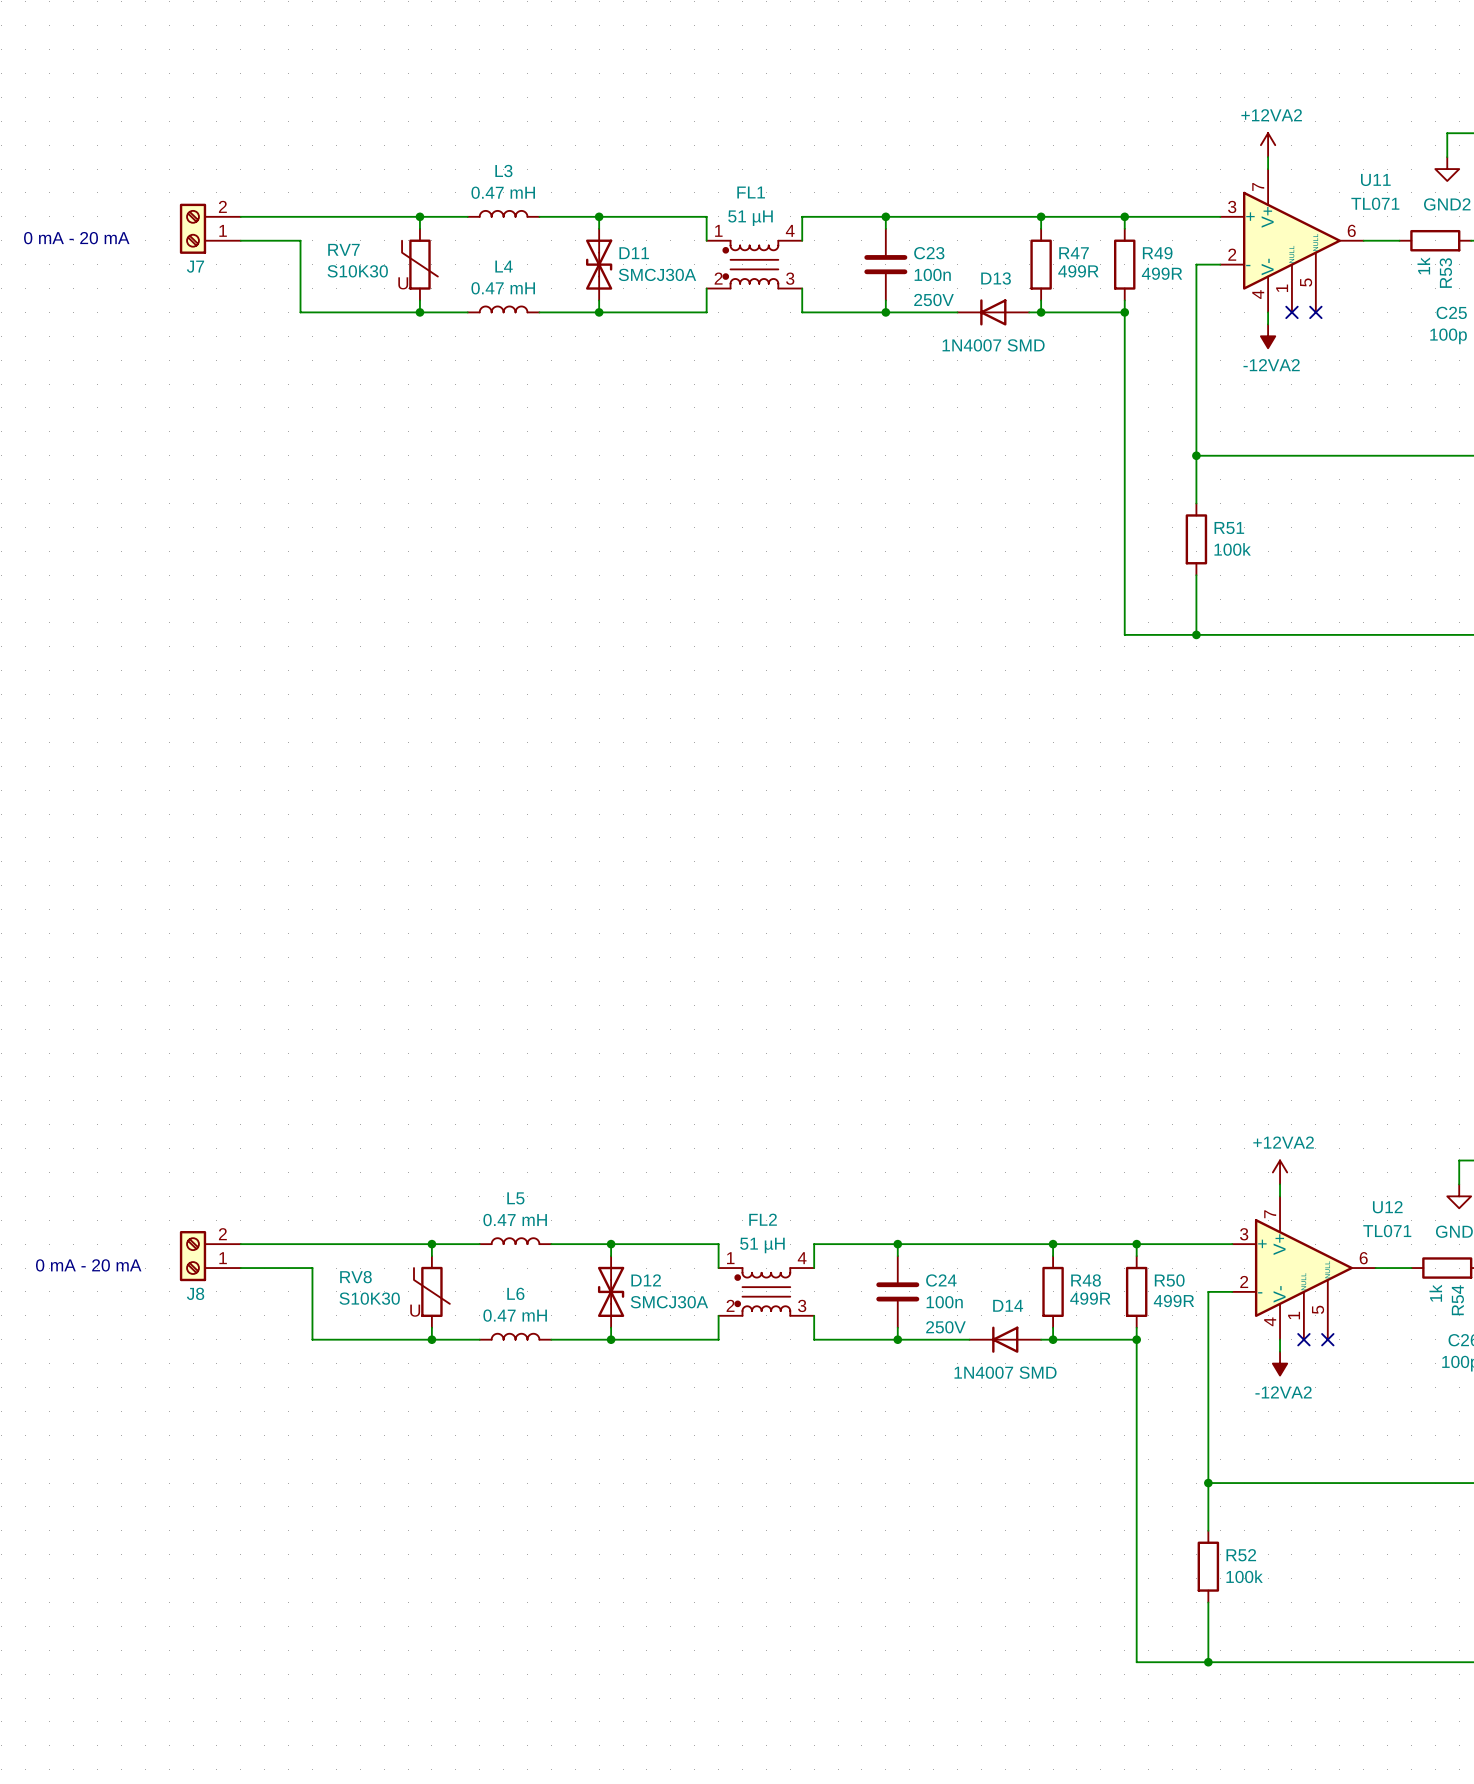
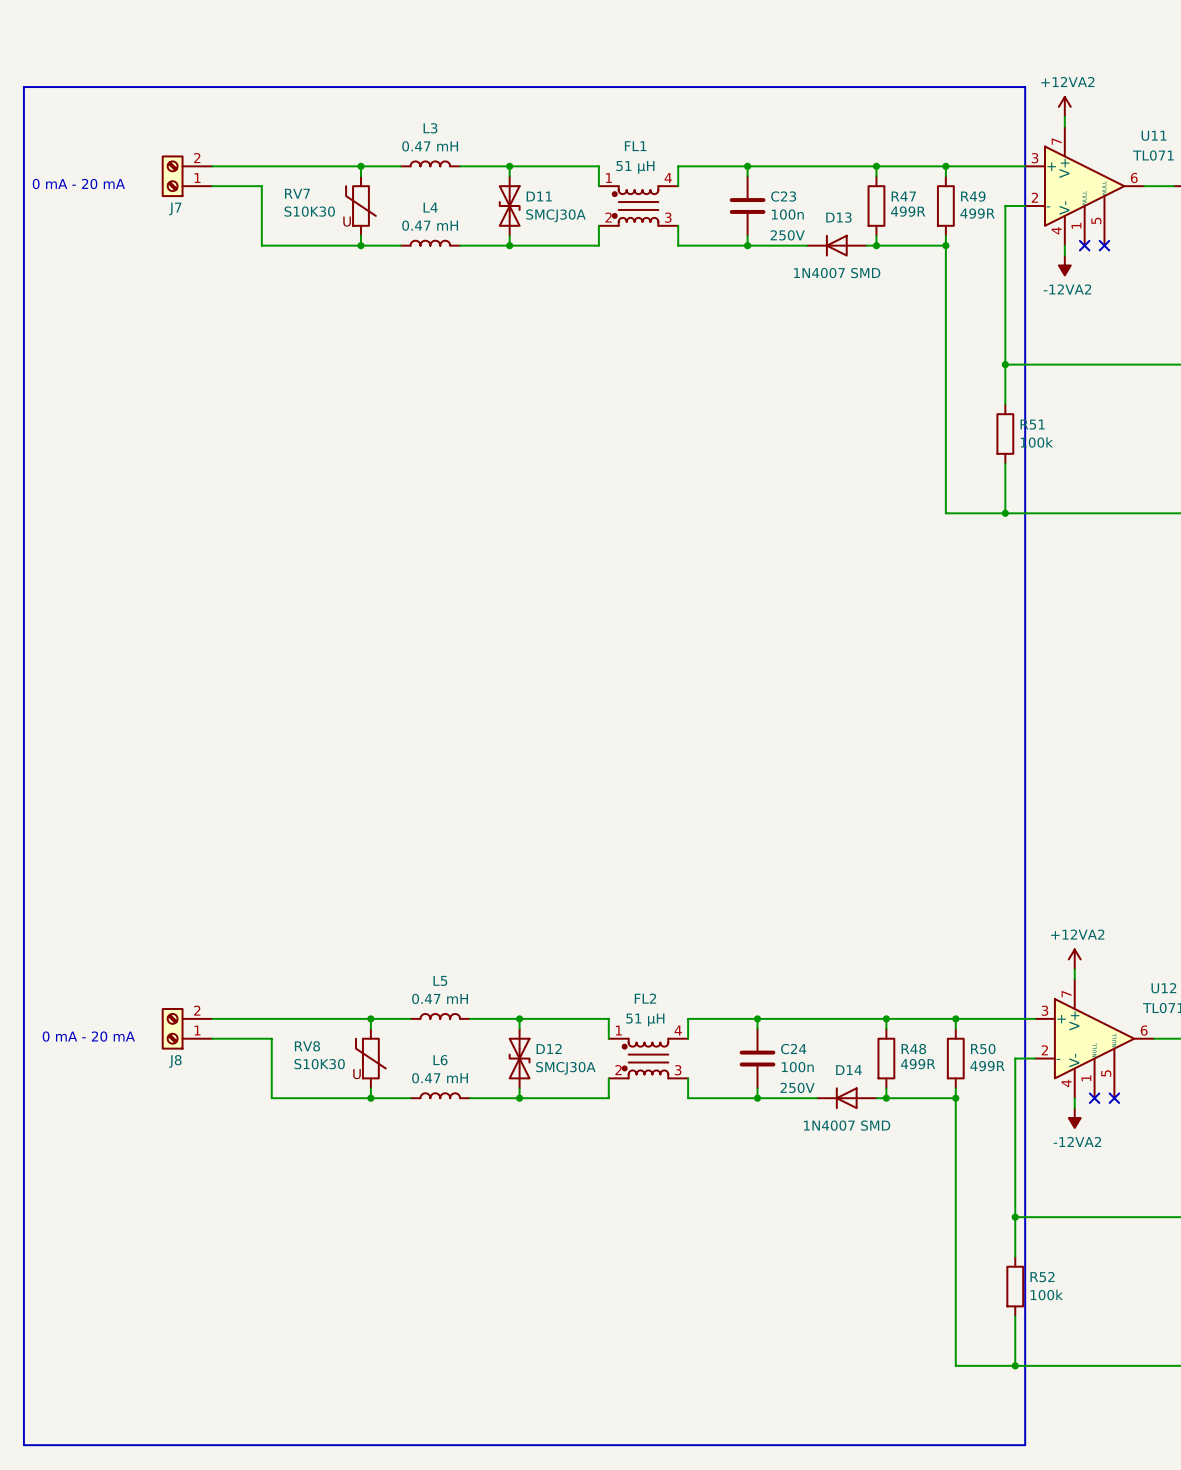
line: none -> (23, 87) (1025, 87) (1025, 1445) (23, 1445) (23, 87)

